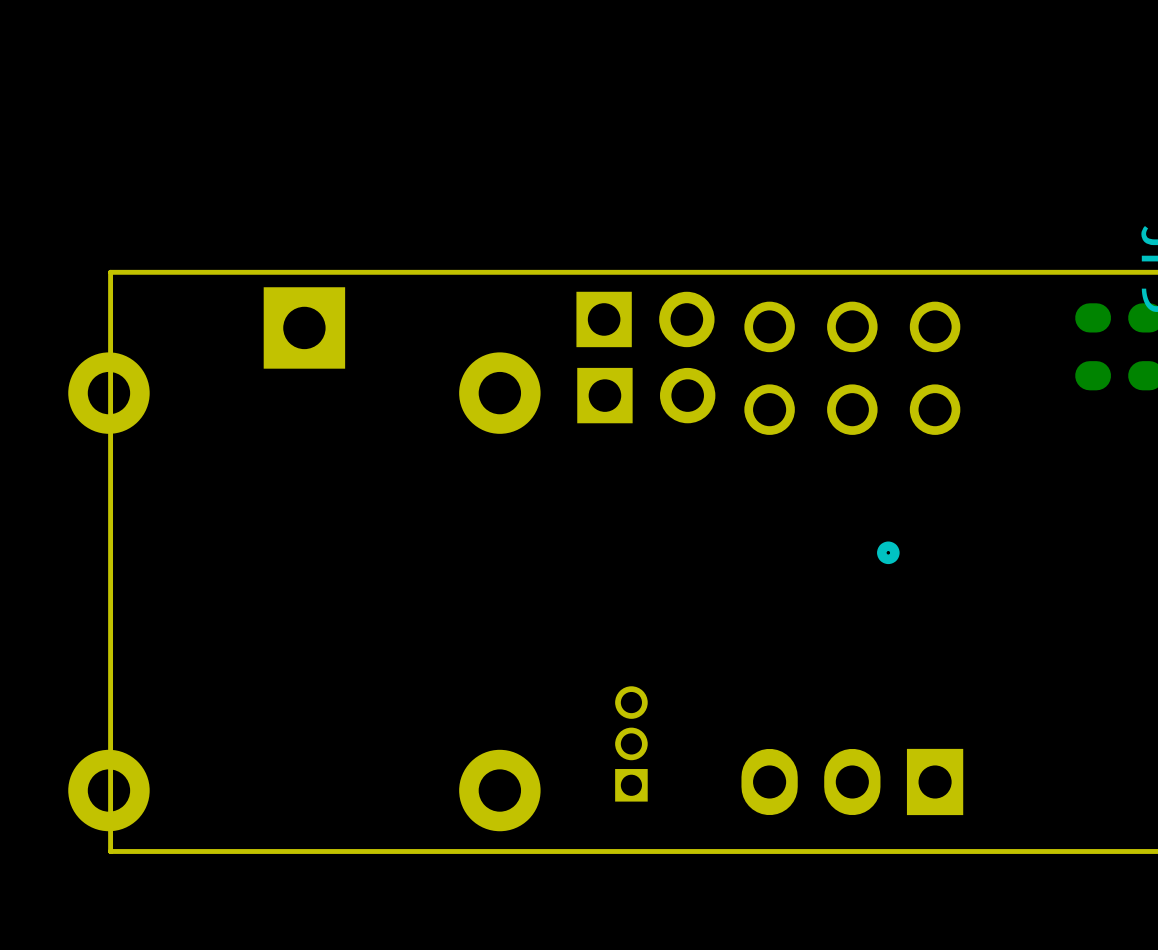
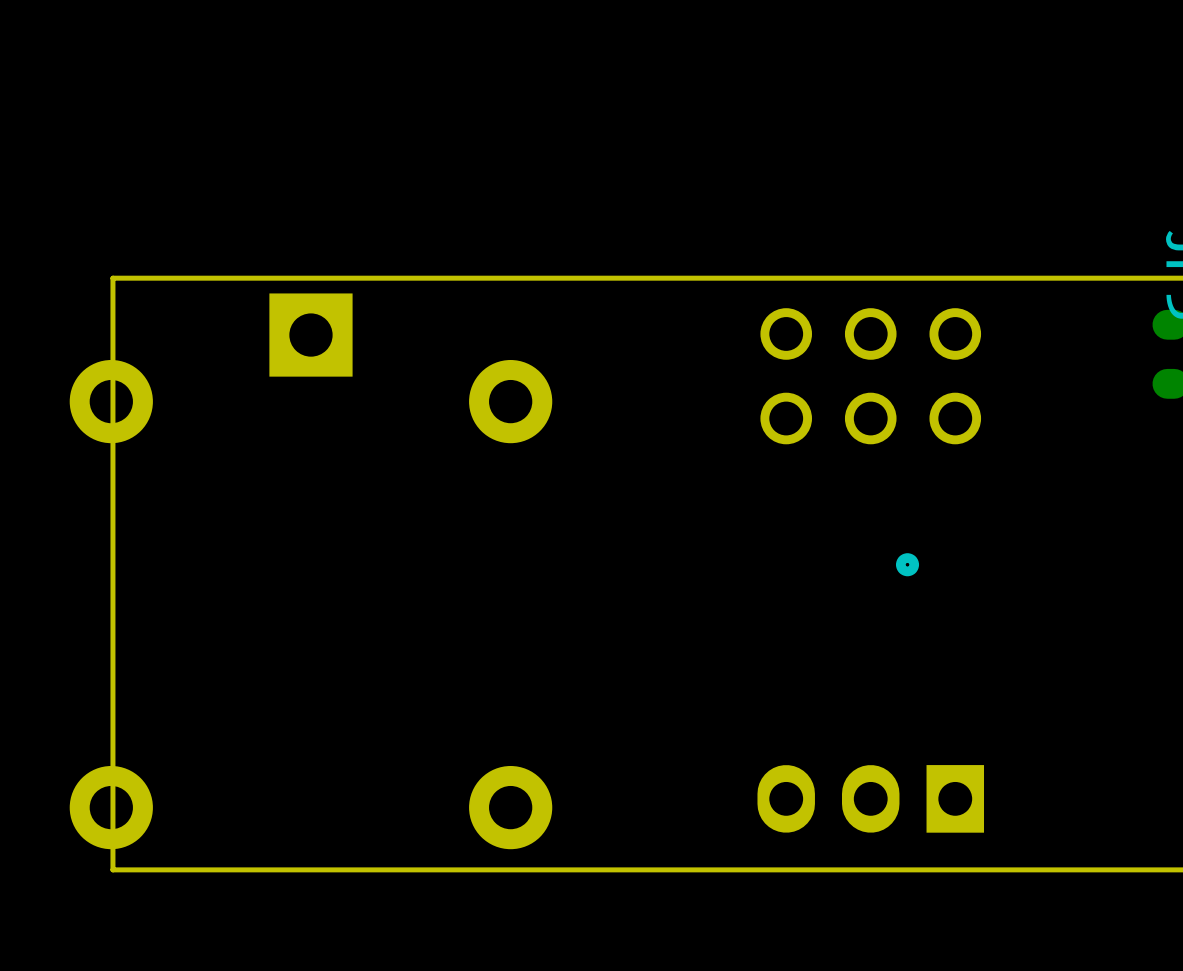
part: (645, 319) -> none
part: (1093, 346) -> none
part: (646, 395) -> none
part: (631, 743) -> none

